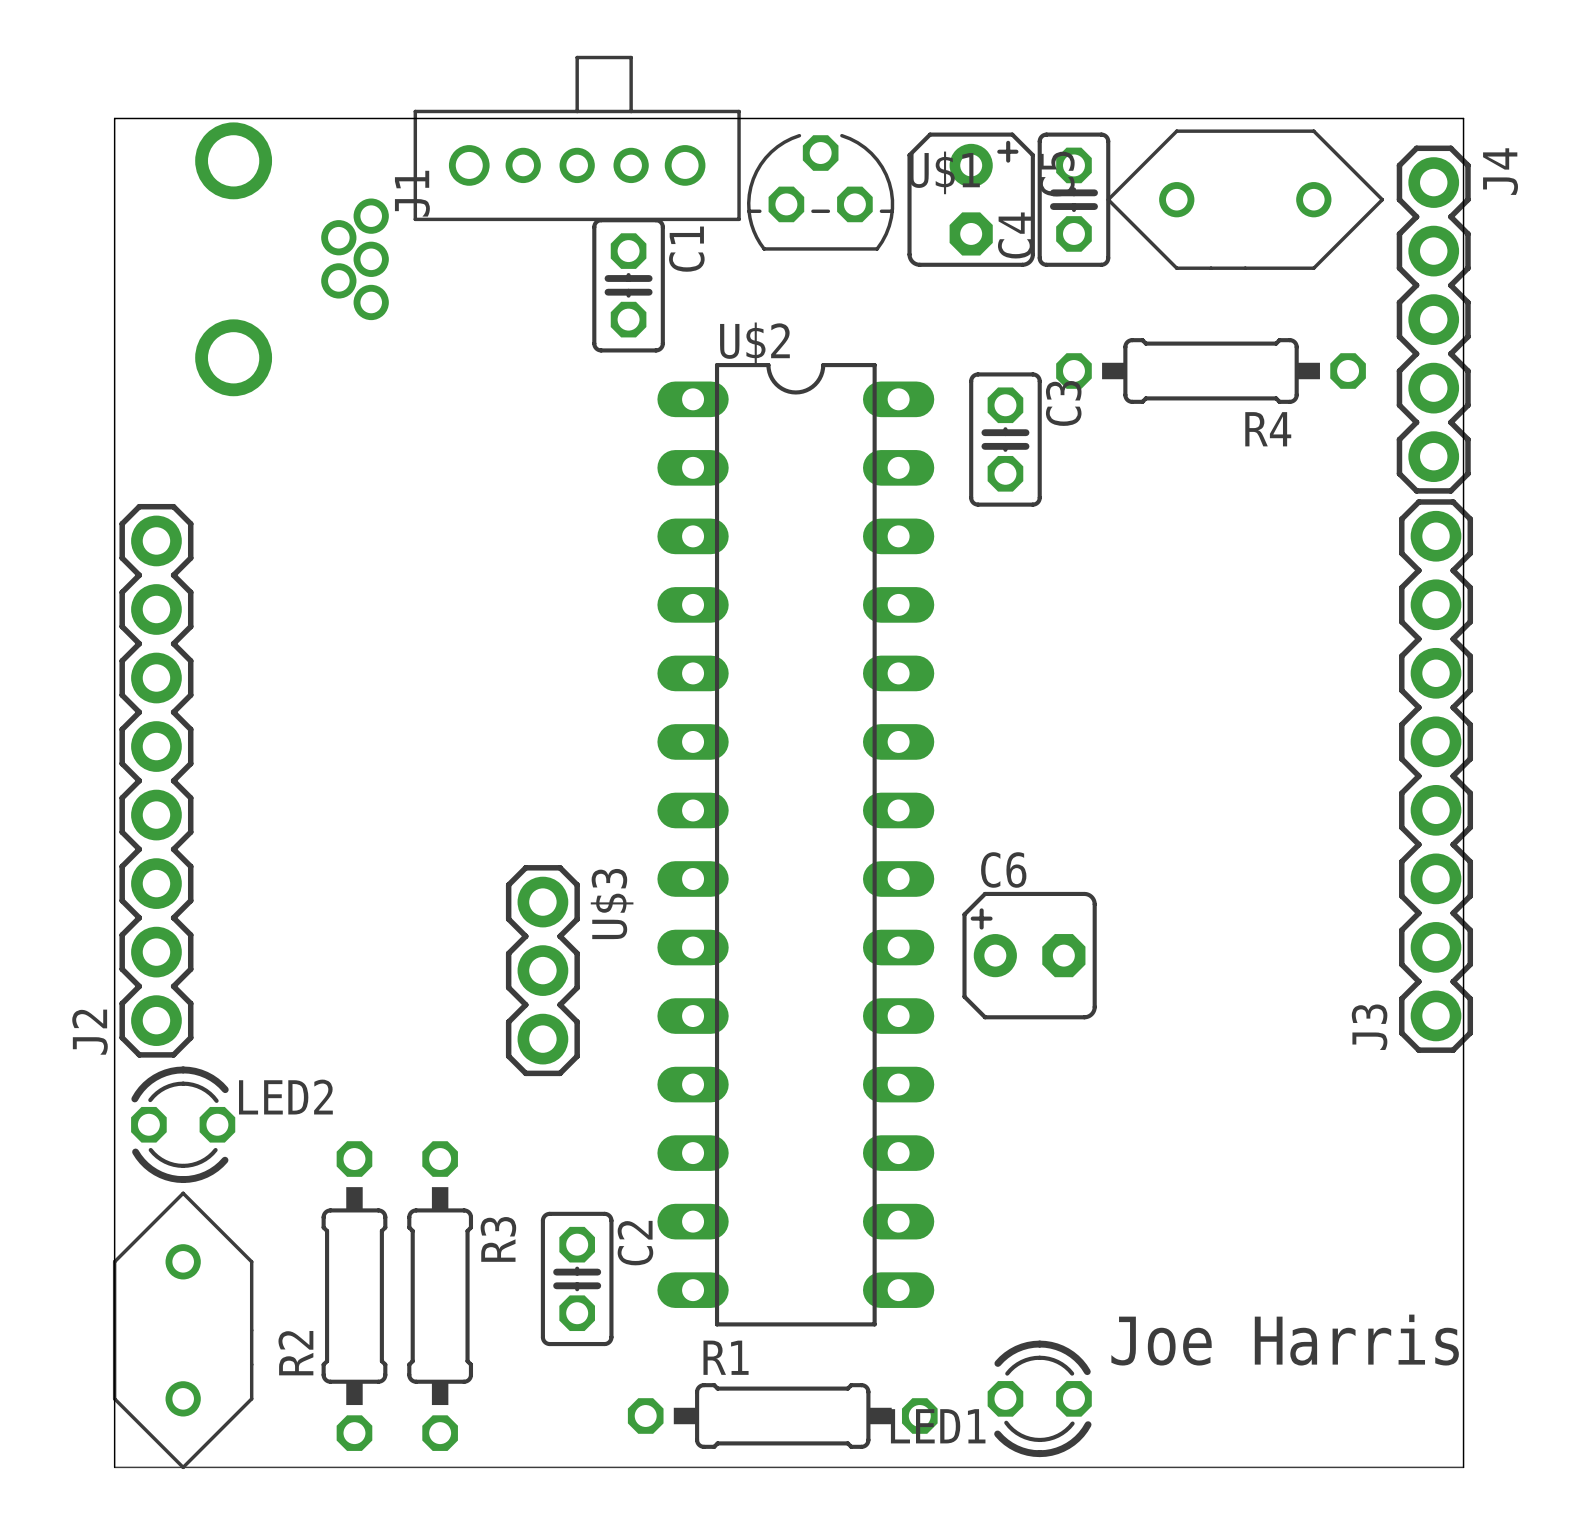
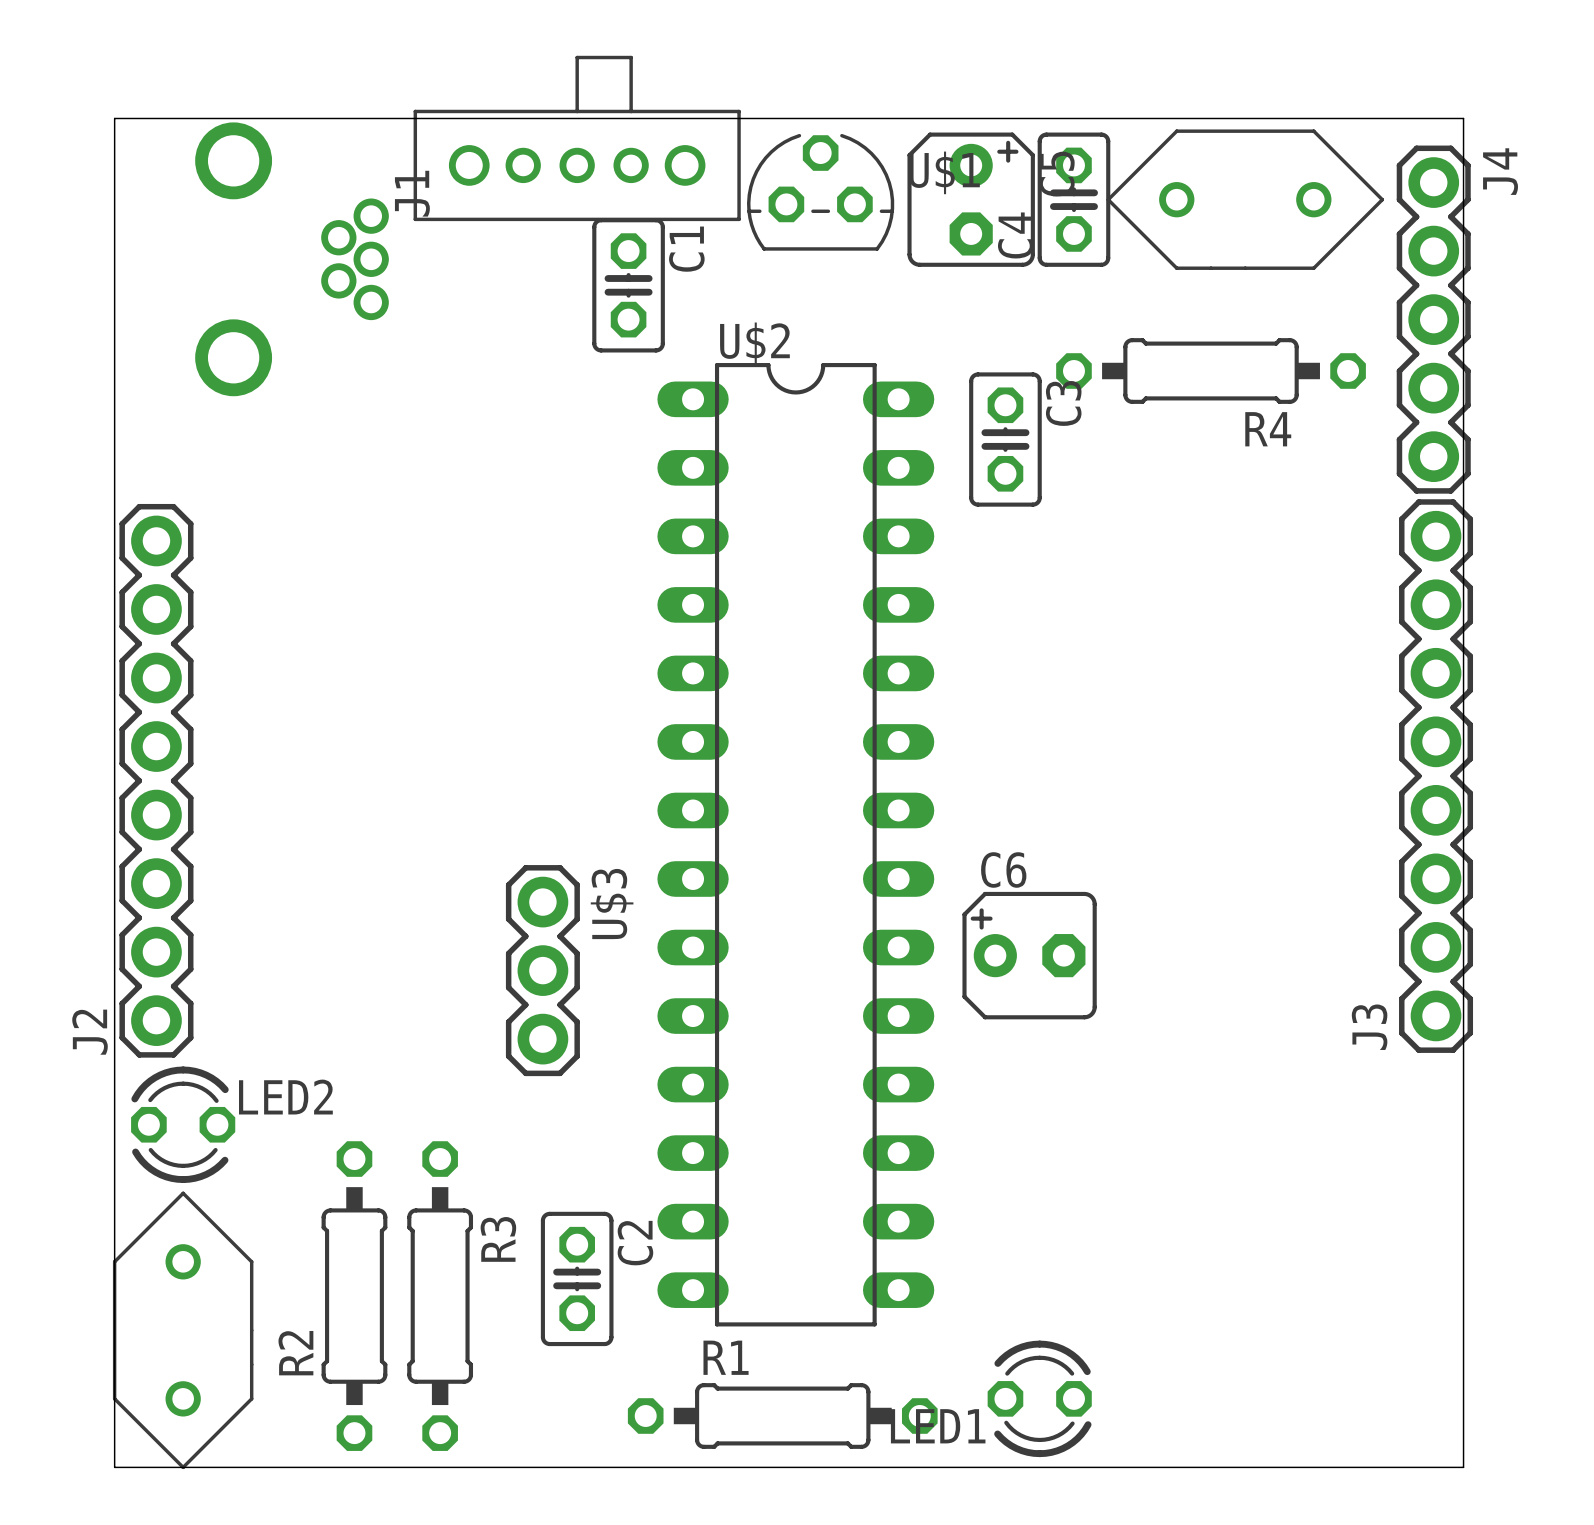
text: Joe Harris (1285, 1340) -> none
line: (114, 1467) (1463, 1467) -> none
board edge: none -> (114, 1467) (1463, 1467)

